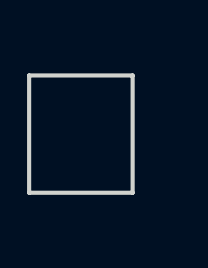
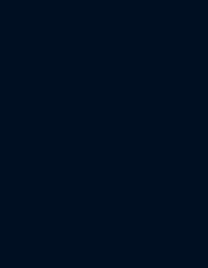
part: (80, 134) -> none

